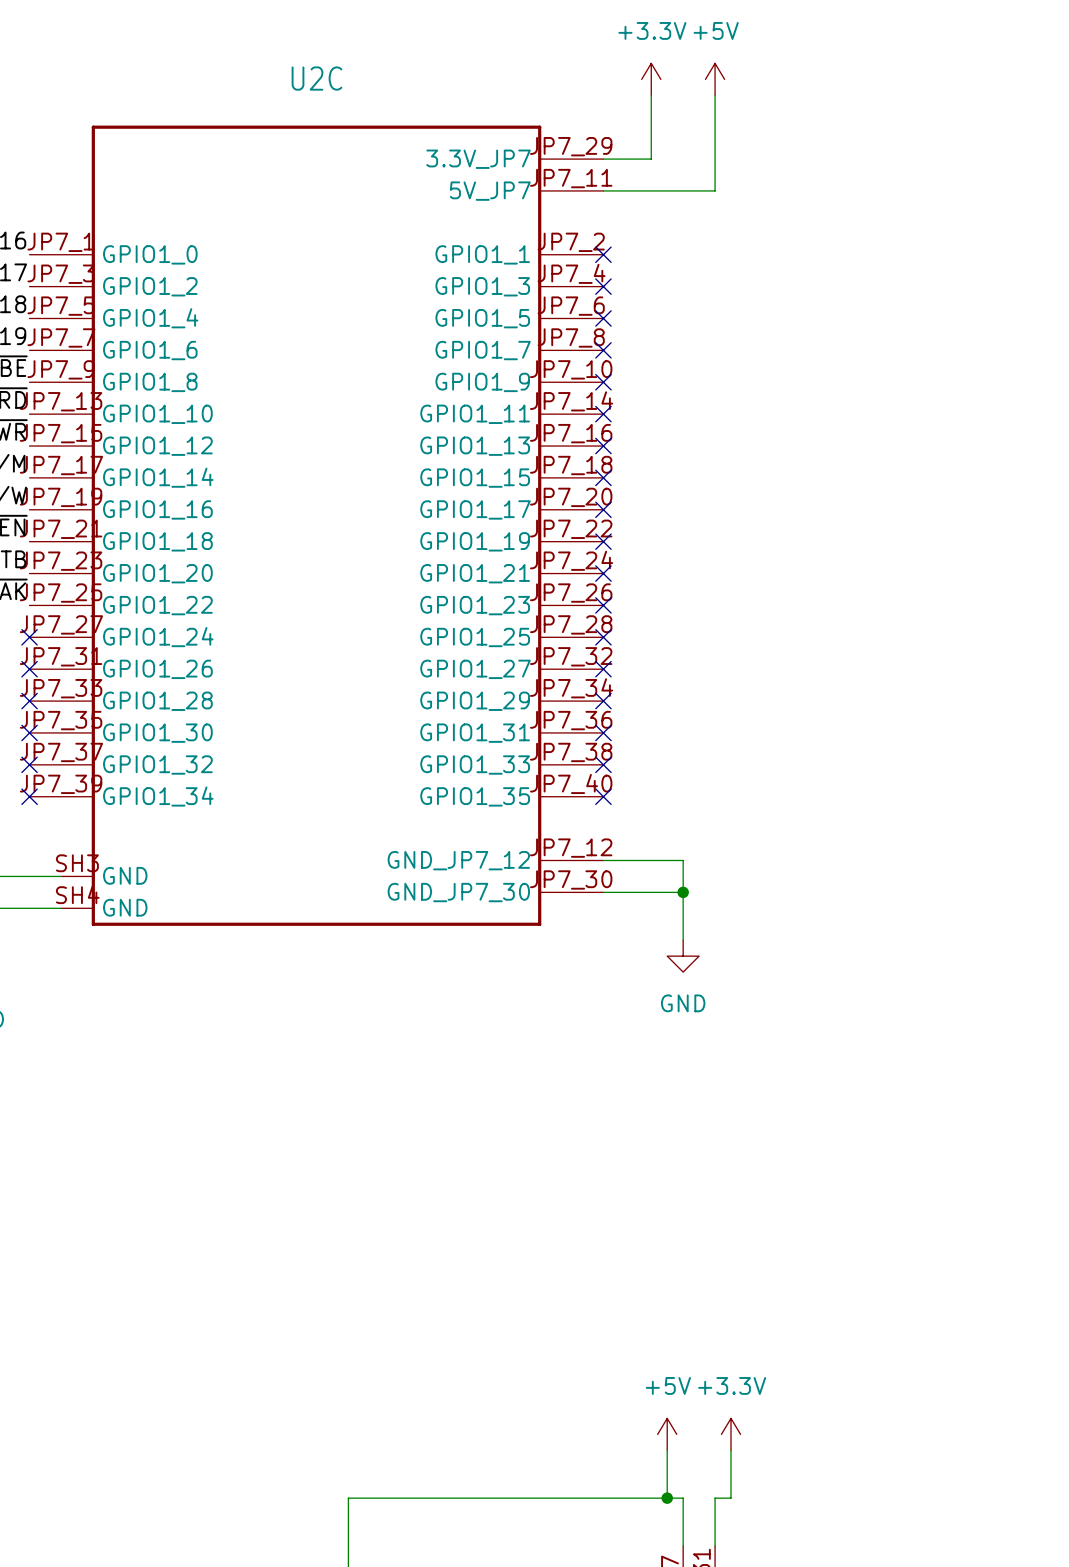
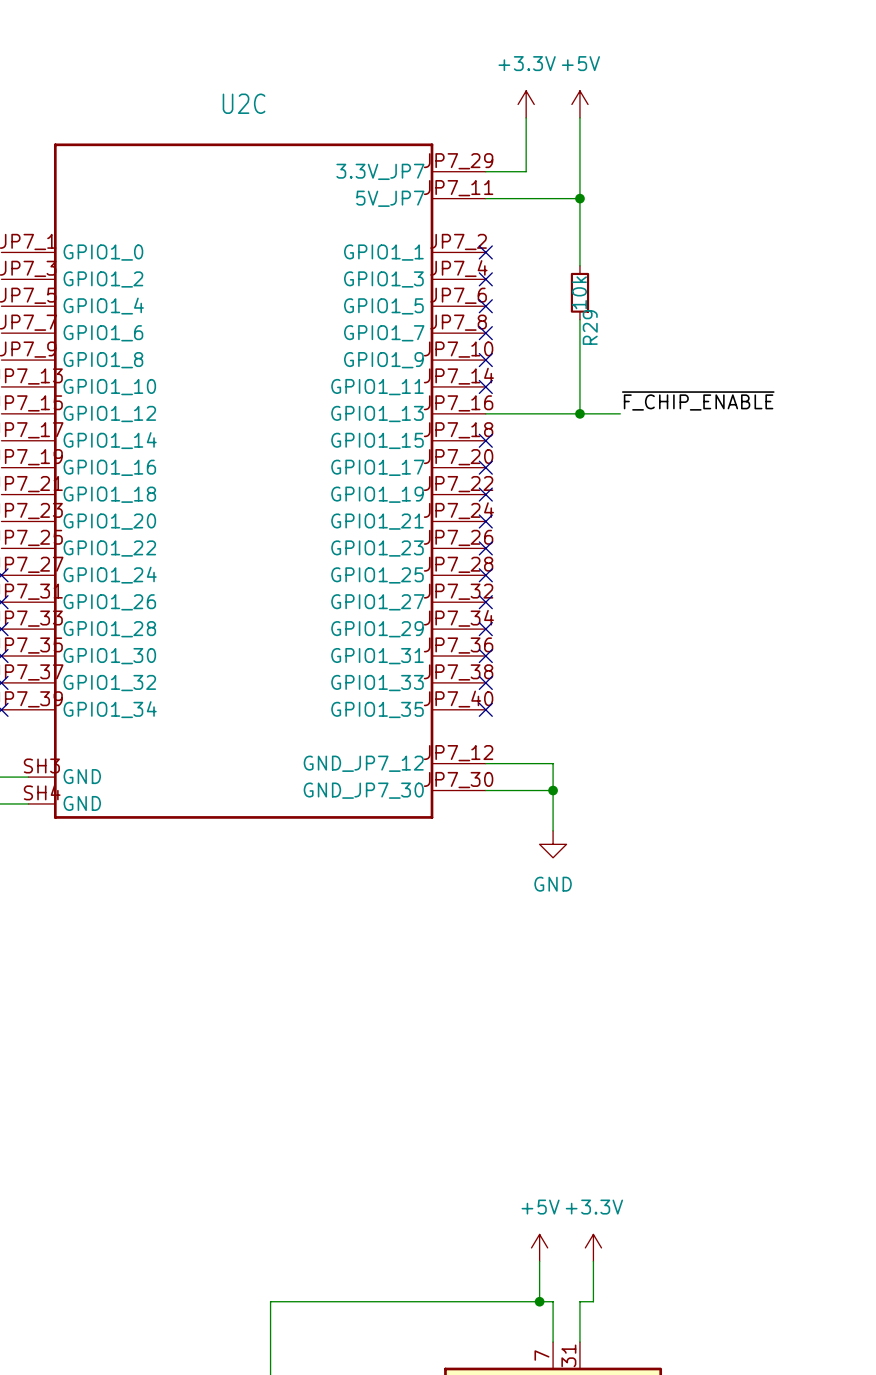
wire: none -> (579, 198) (579, 265)
junction: none -> (579, 198)
R29: none -> 10k (579, 292)
wire: none -> (579, 319) (579, 413)
label: none -> ~{F_CHIP_ENABLE} (698, 400)
wire: none -> (485, 413) (620, 413)
no-connect mark: (603, 446) -> none
junction: none -> (579, 413)

